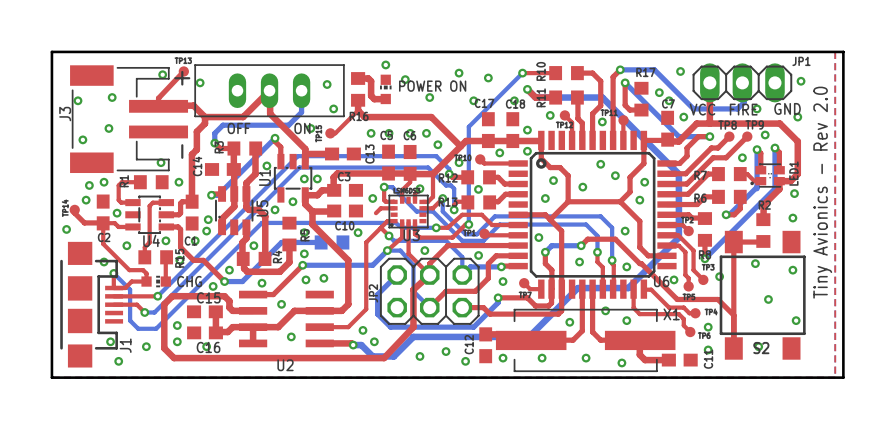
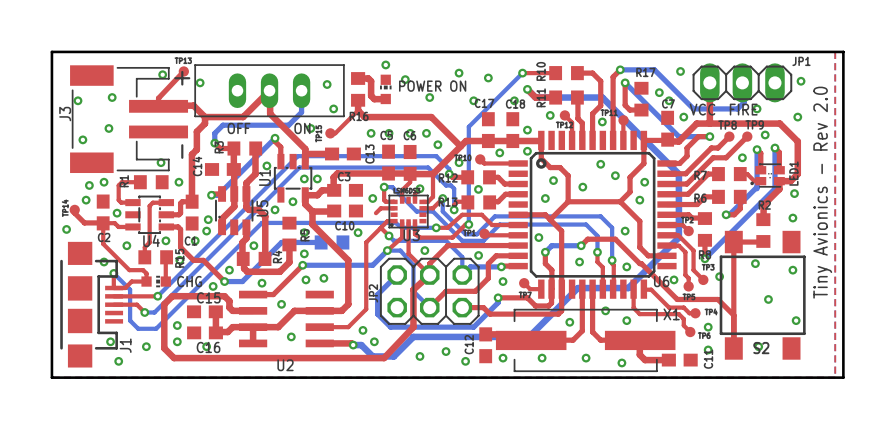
text: GND (787, 108) -> none

